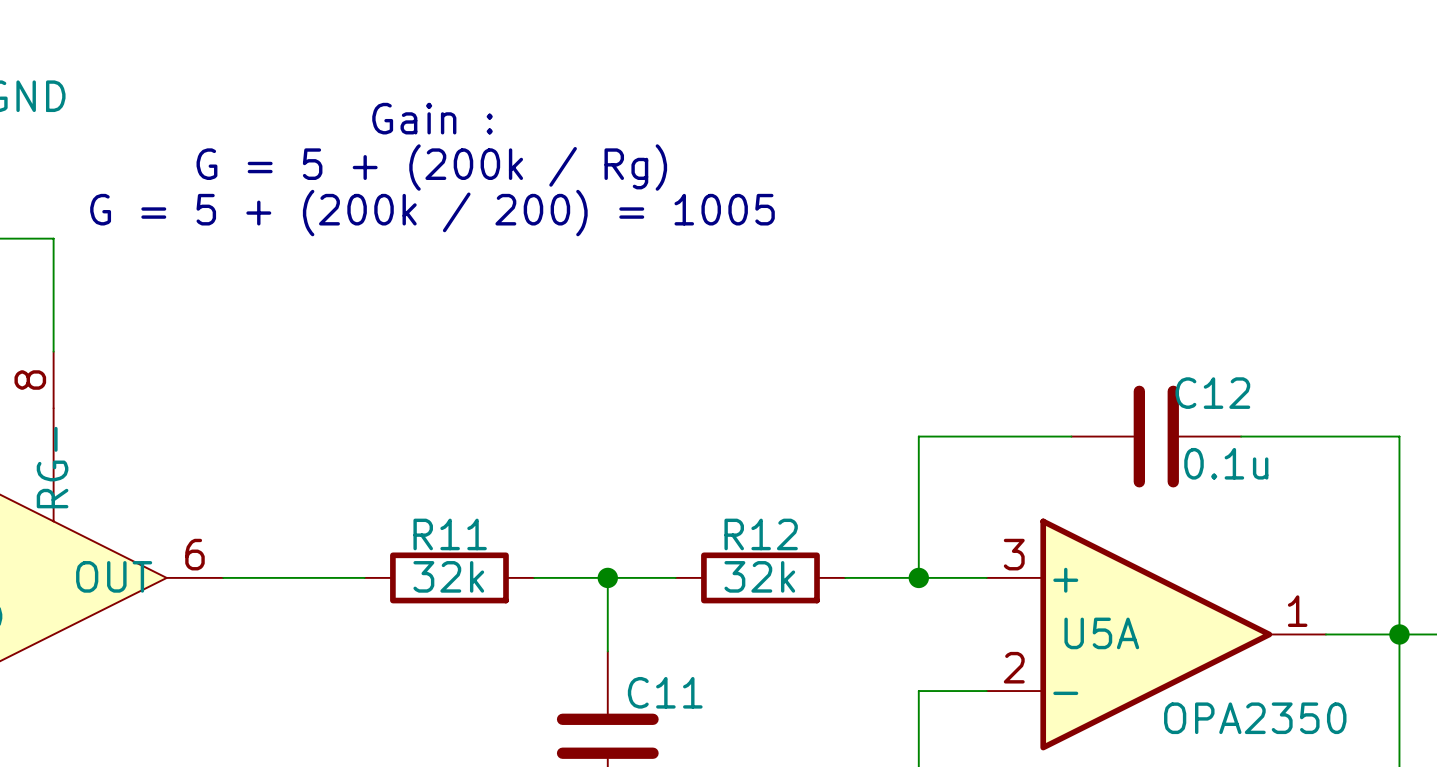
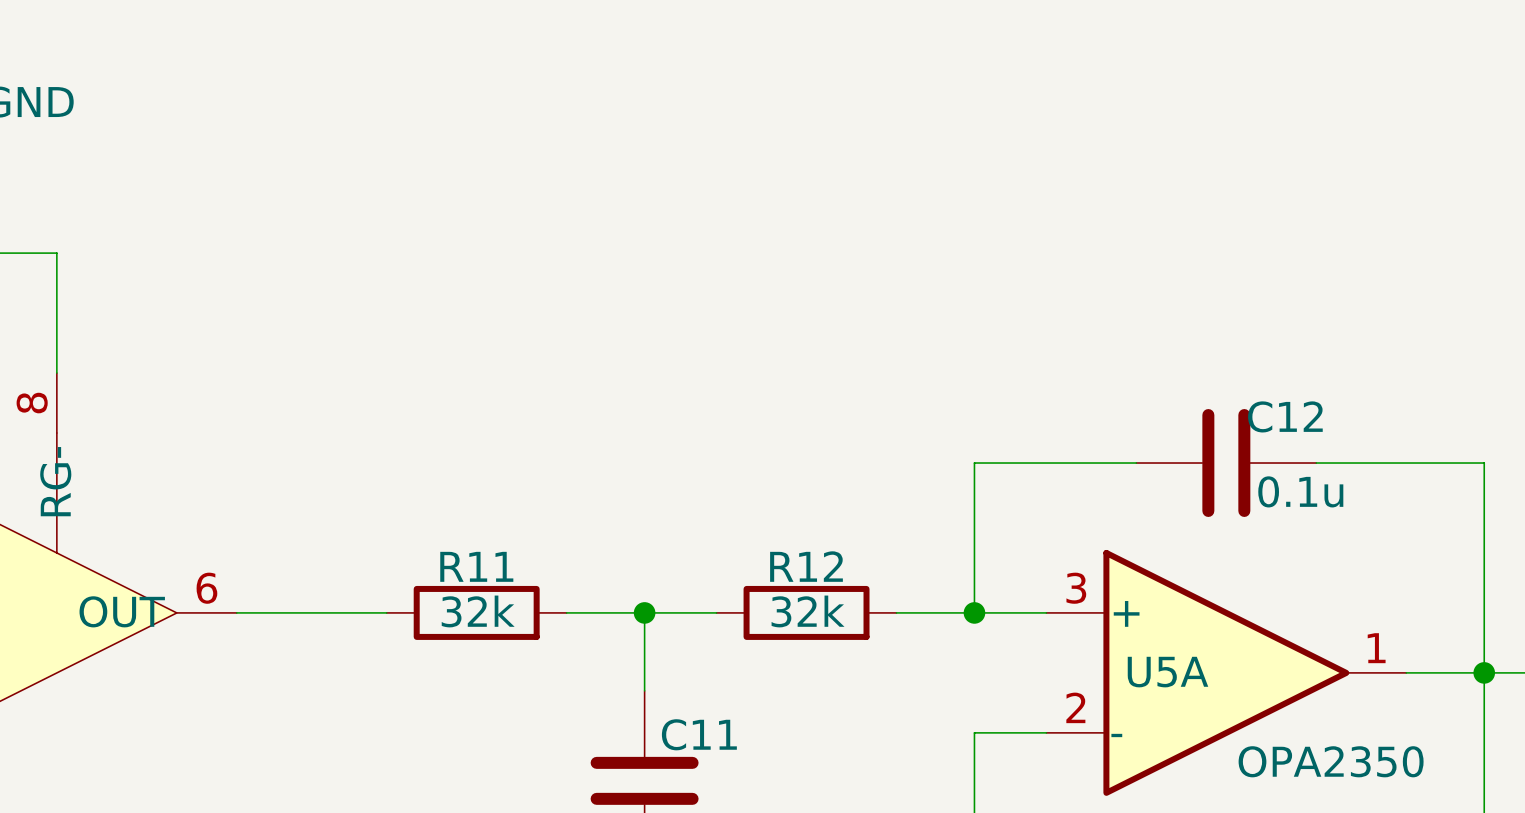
text: Gain : (432, 118) -> none
text: G = 5 + (200k / Rg) (431, 167) -> none
text: G = 5 + (200k / 200) = 1005 (432, 213) -> none

